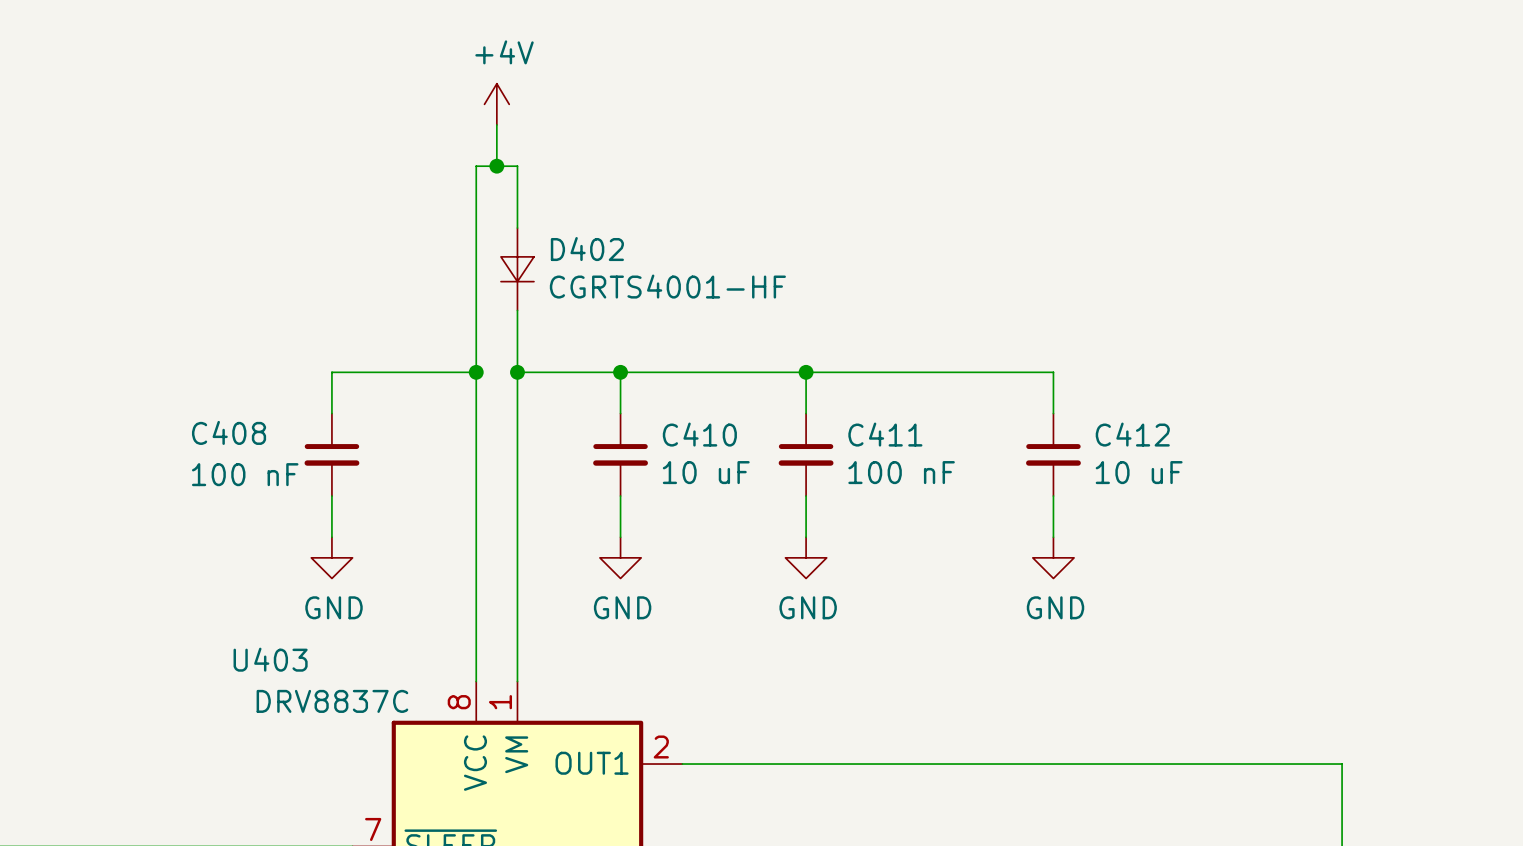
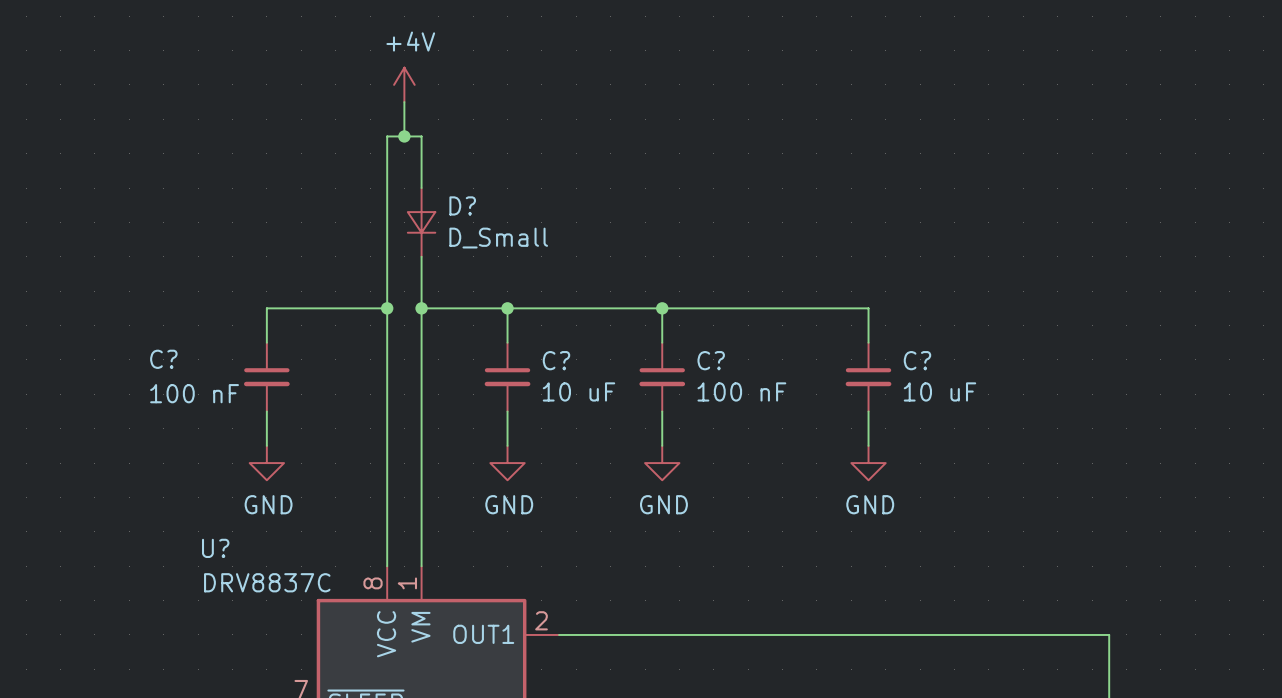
D402 name: D402 (587, 249) -> D? (462, 205)
D402 value: CGRTS4001-HF (667, 286) -> D_Small (498, 238)
C408 name: C408 (229, 432) -> C? (163, 359)
C410 name: C410 (699, 434) -> C? (556, 360)
C411 name: C411 (885, 434) -> C? (711, 360)
C412 name: C412 (1132, 434) -> C? (917, 360)
U403 name: U403 (270, 659) -> U? (215, 548)

